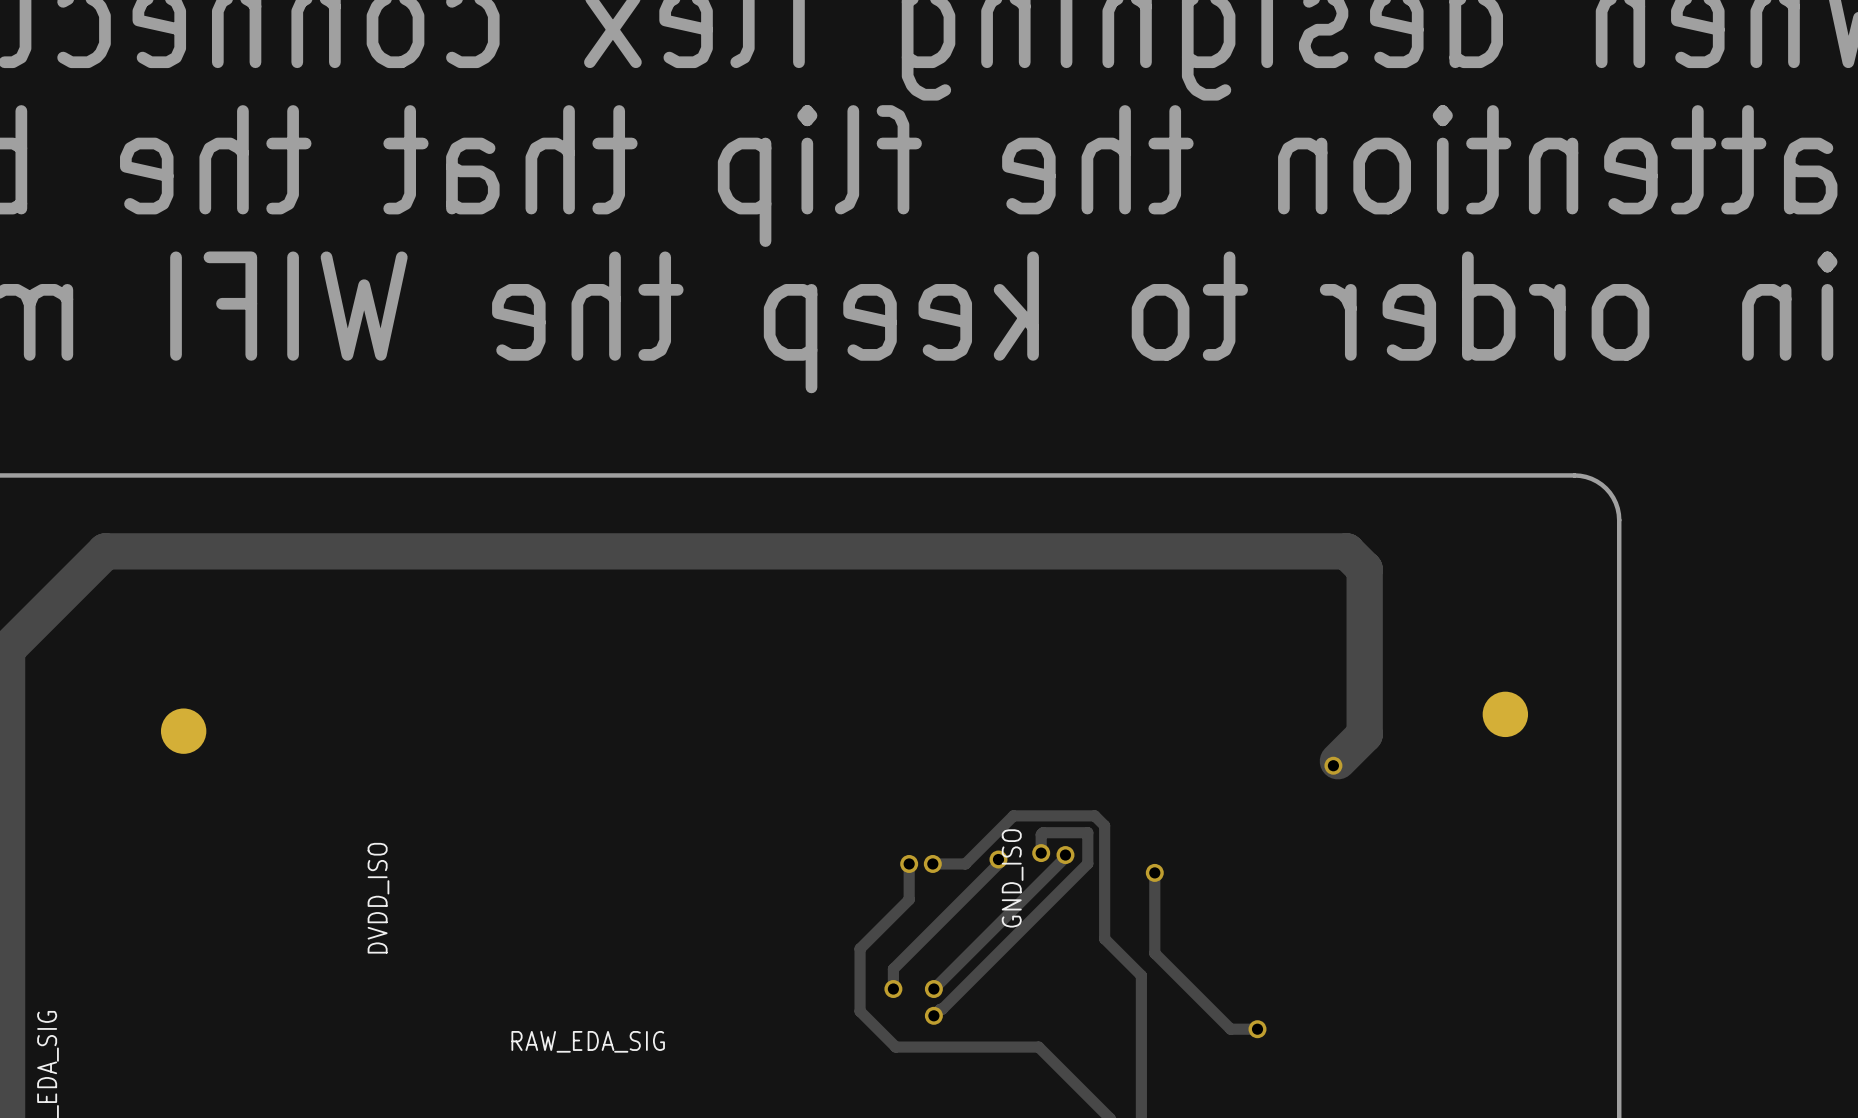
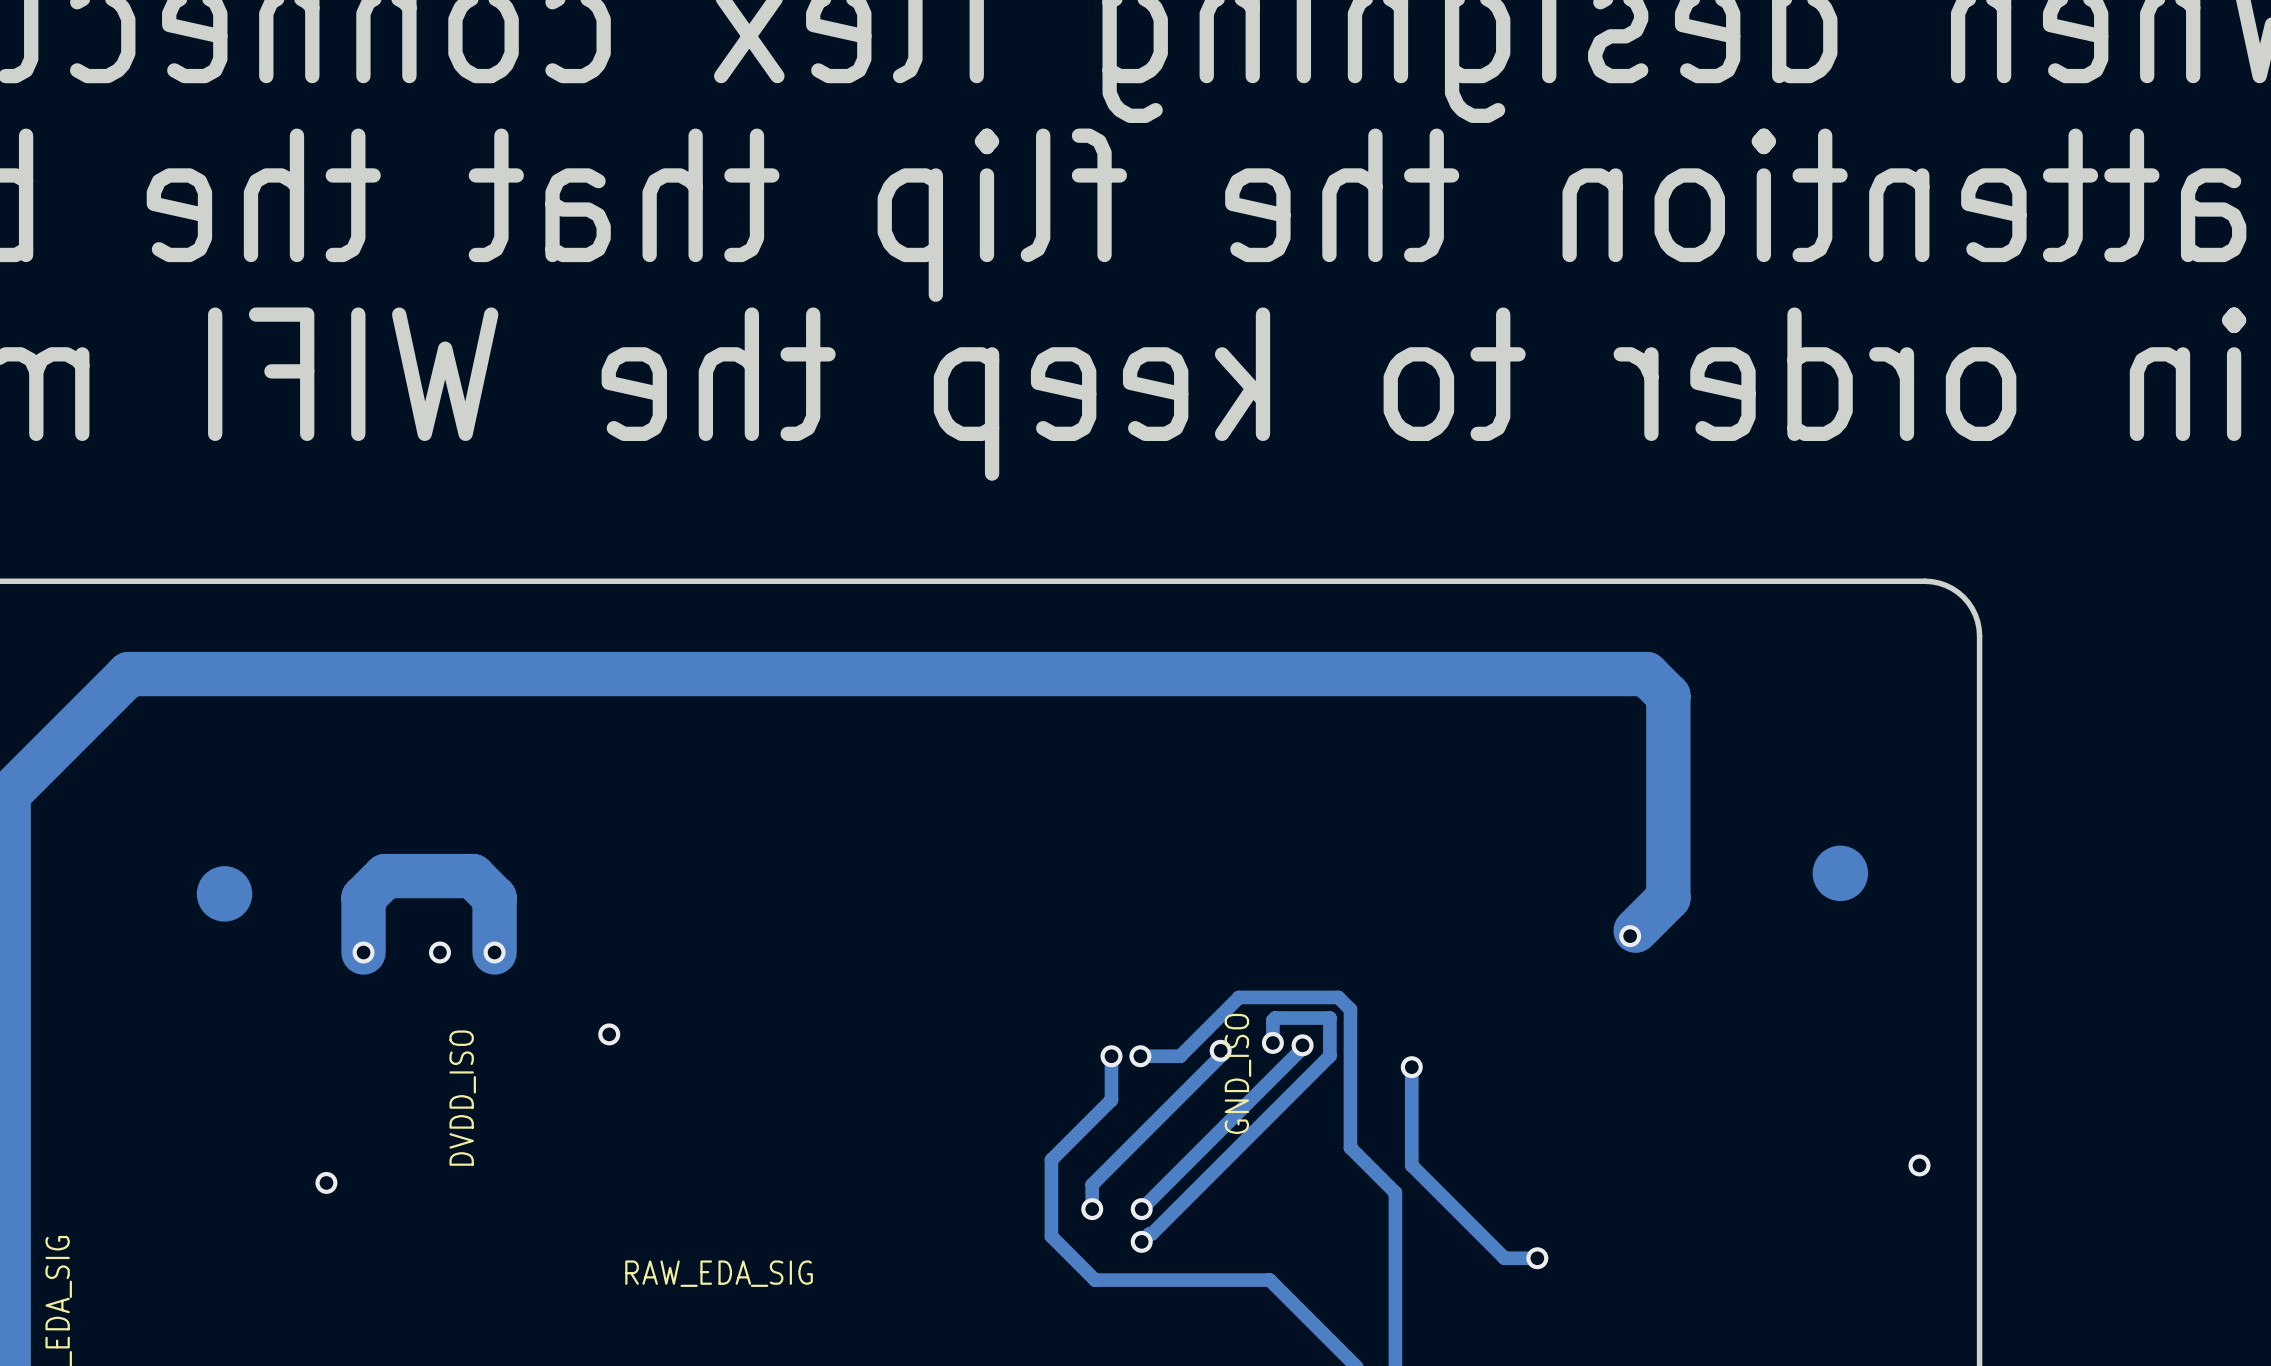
via: none -> (363, 952)
via: none -> (439, 952)
track: none -> (494, 952) (494, 897) (472, 876) (385, 876) (363, 897) (363, 952)
via: none -> (494, 952)
via: none -> (609, 1034)
via: none -> (1919, 1165)
via: none -> (326, 1182)

